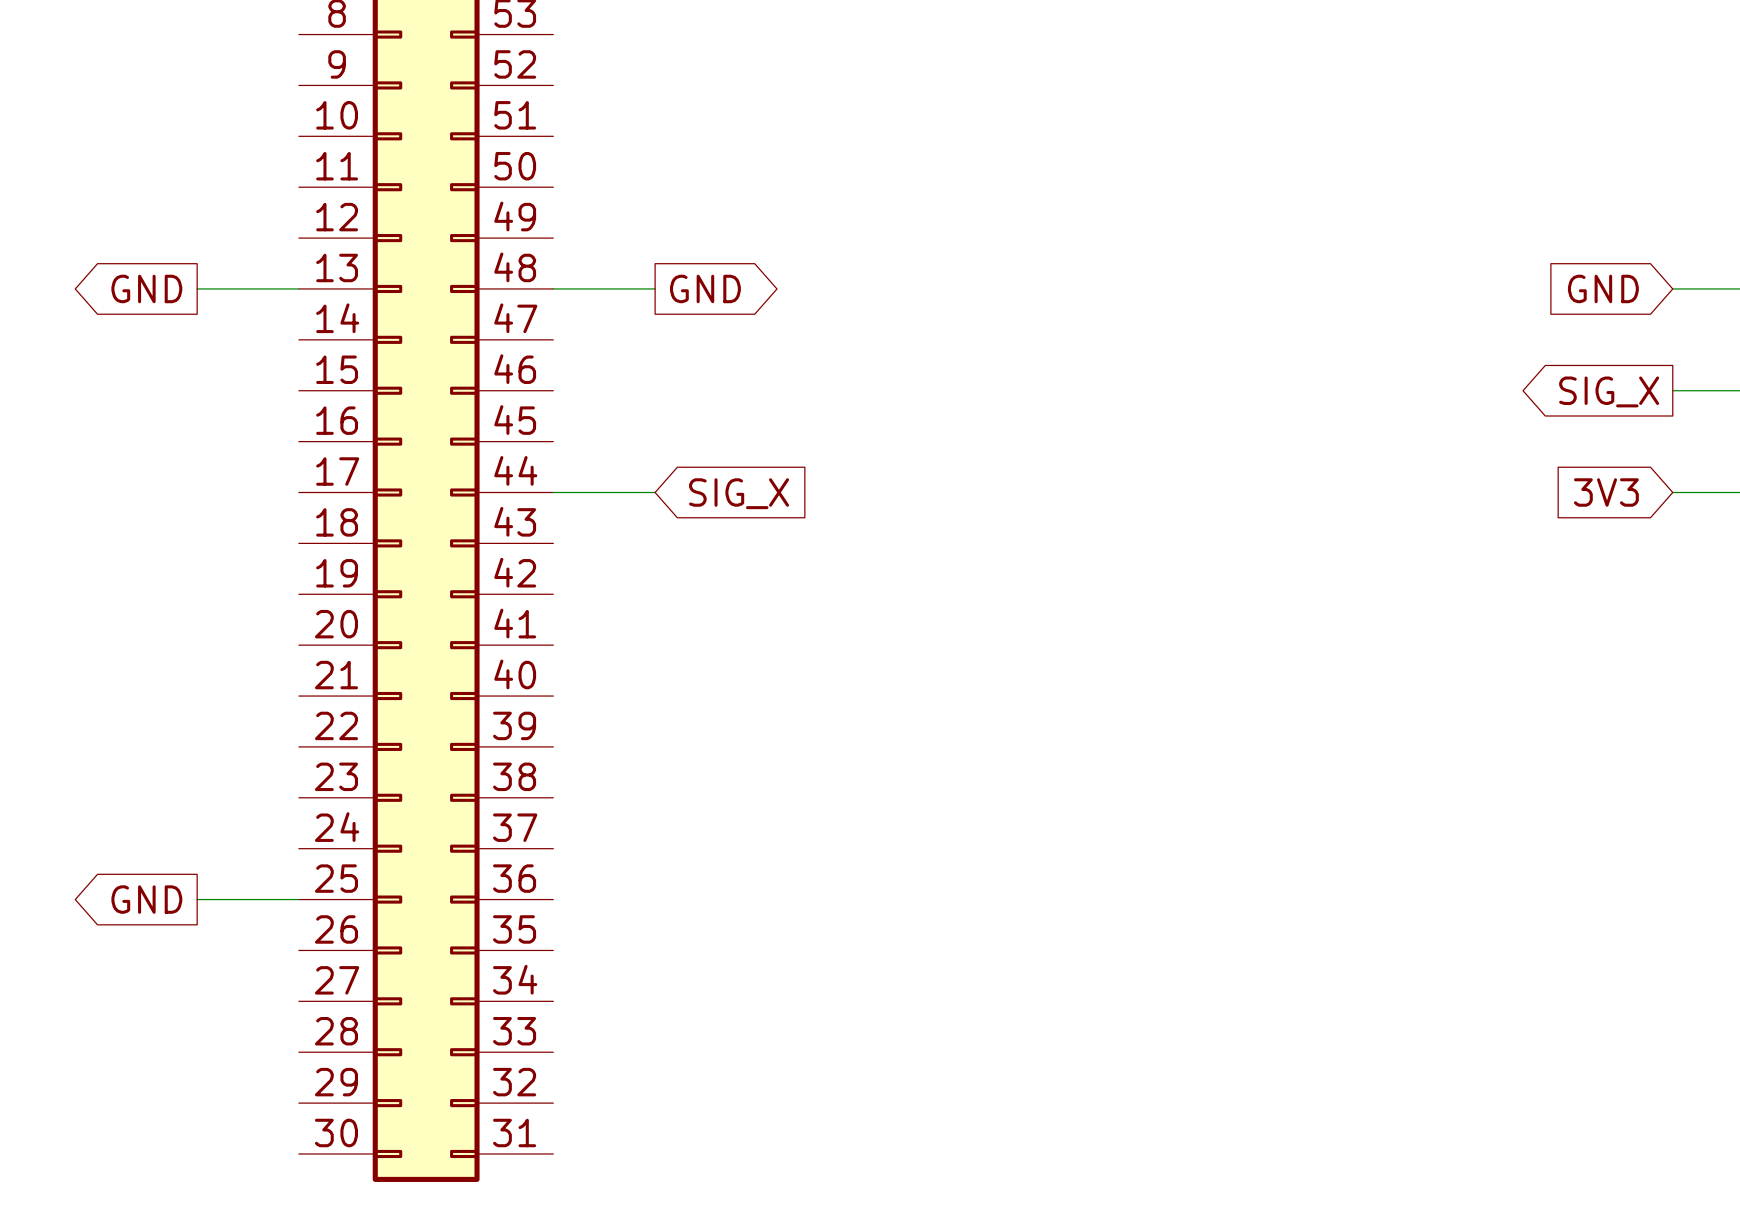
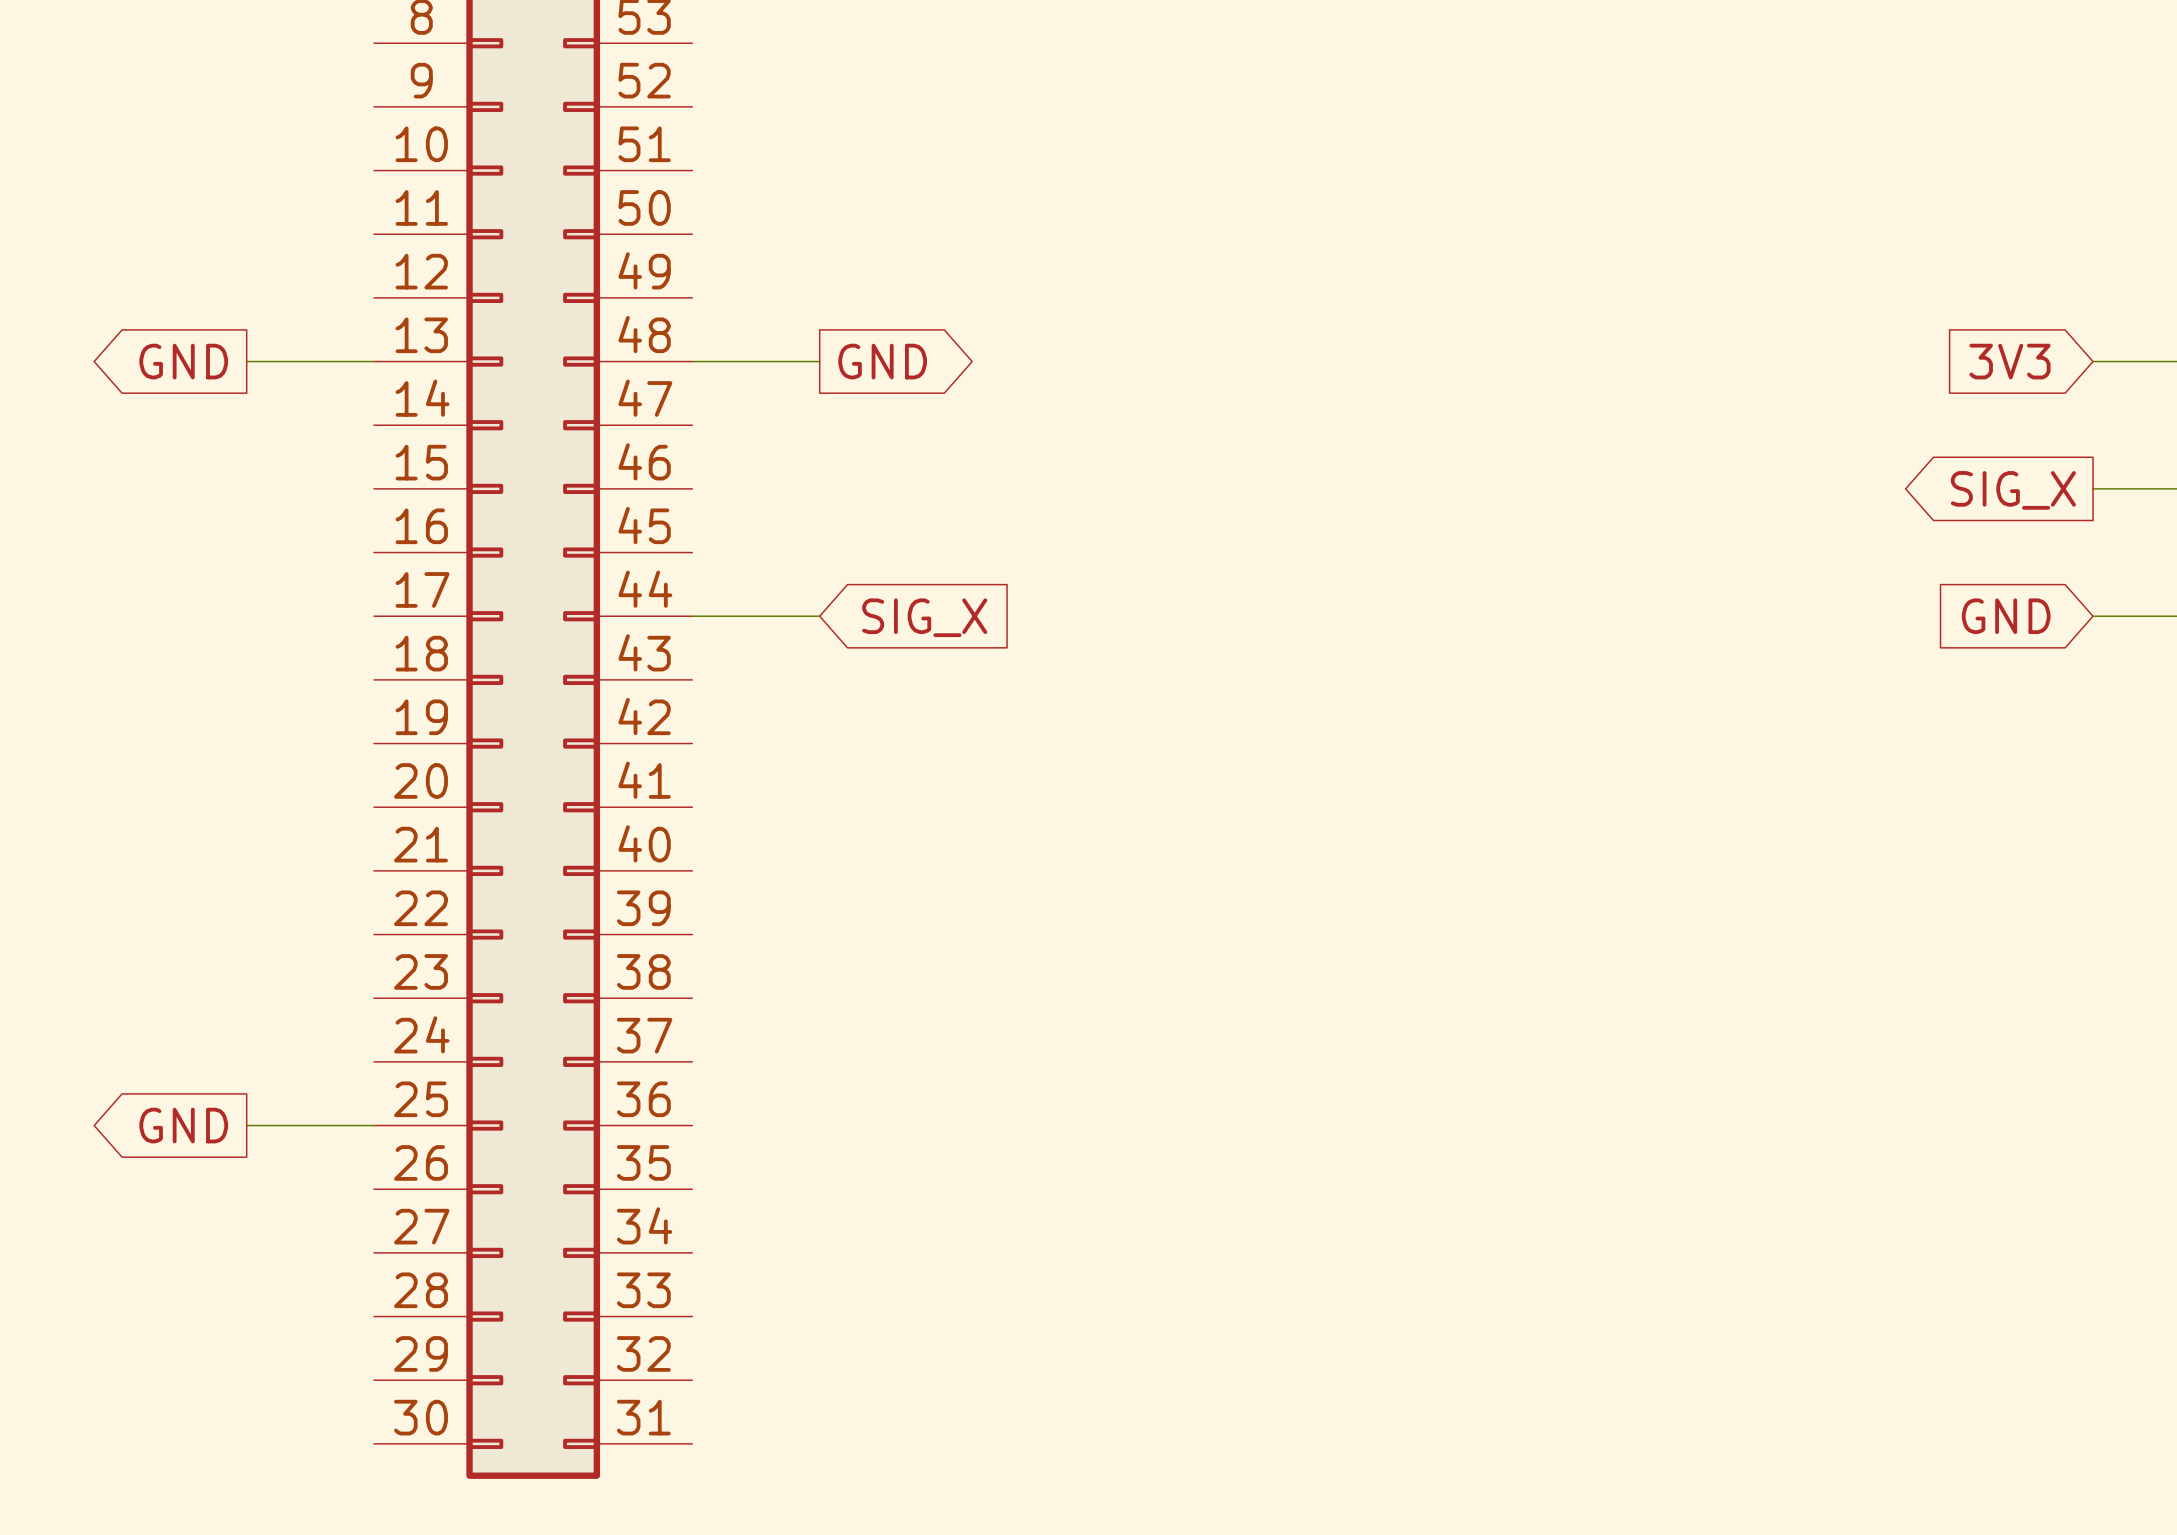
global label: GND (1603, 288) -> 3V3 (2009, 361)
global label: 3V3 (1606, 492) -> GND (2006, 616)

